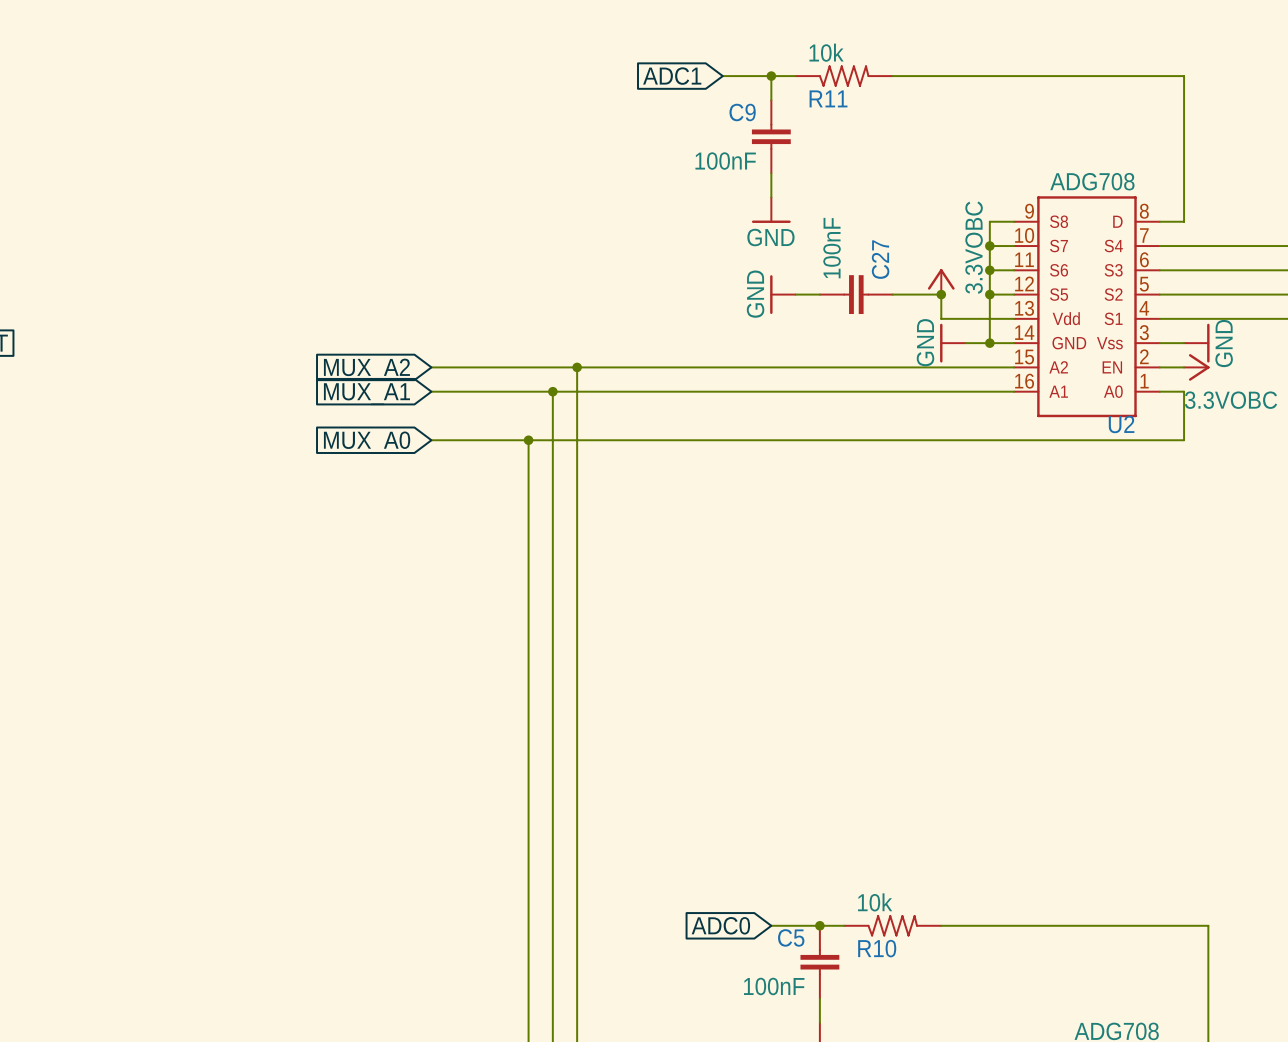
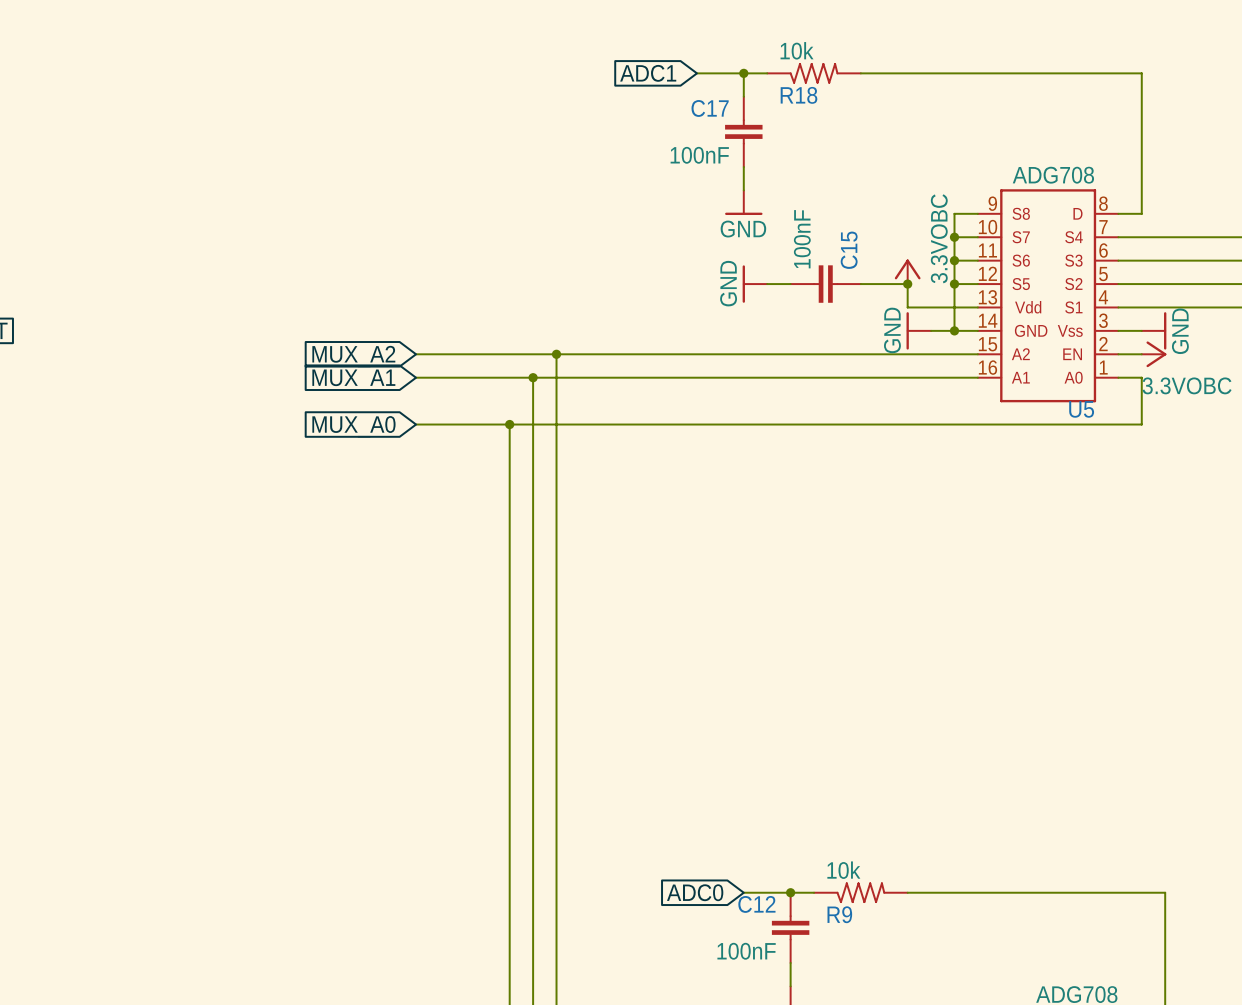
R11 name: R11 (828, 98) -> R18 (798, 95)
C9 name: C9 (742, 112) -> C17 (710, 108)
C27 name: C27 (880, 259) -> C15 (849, 250)
U2 name: U2 (1121, 424) -> U5 (1081, 409)
C5 name: C5 (791, 937) -> C12 (756, 904)
R10 name: R10 (877, 948) -> R9 (839, 914)

